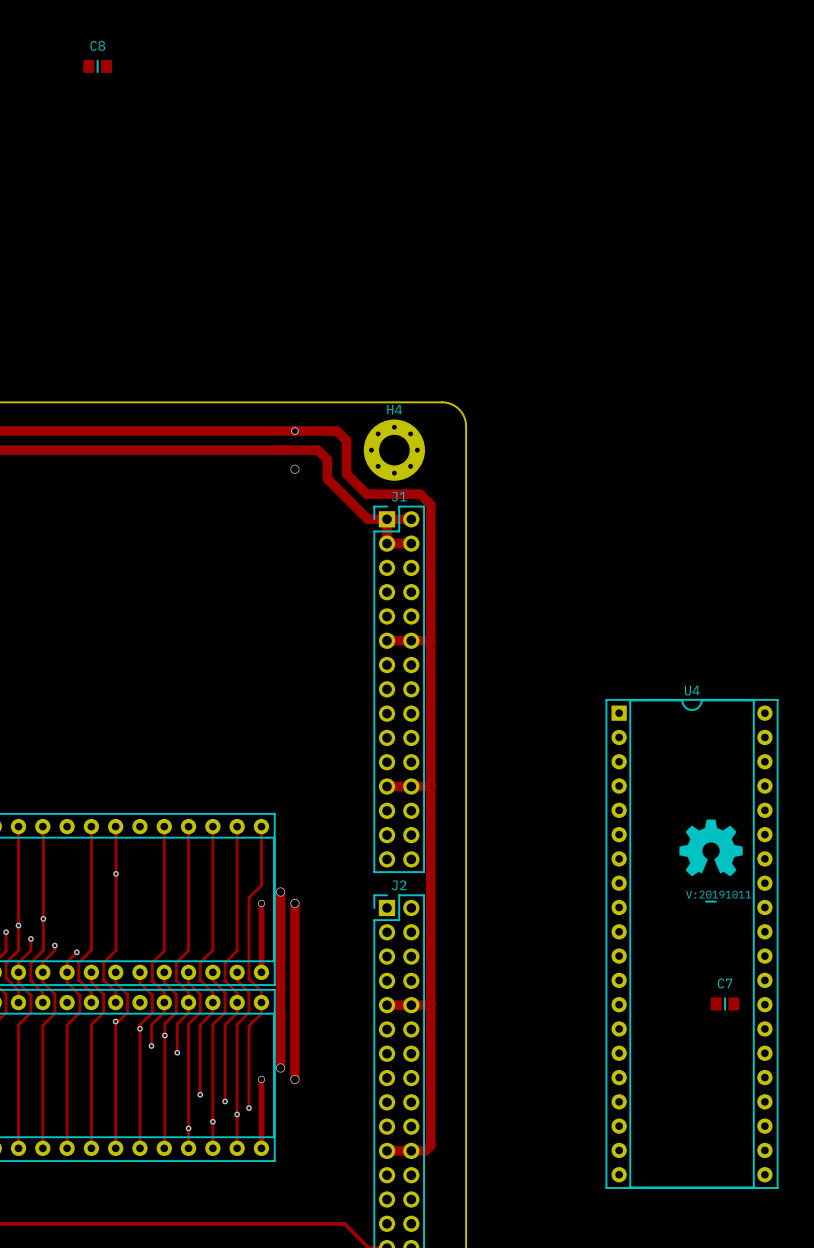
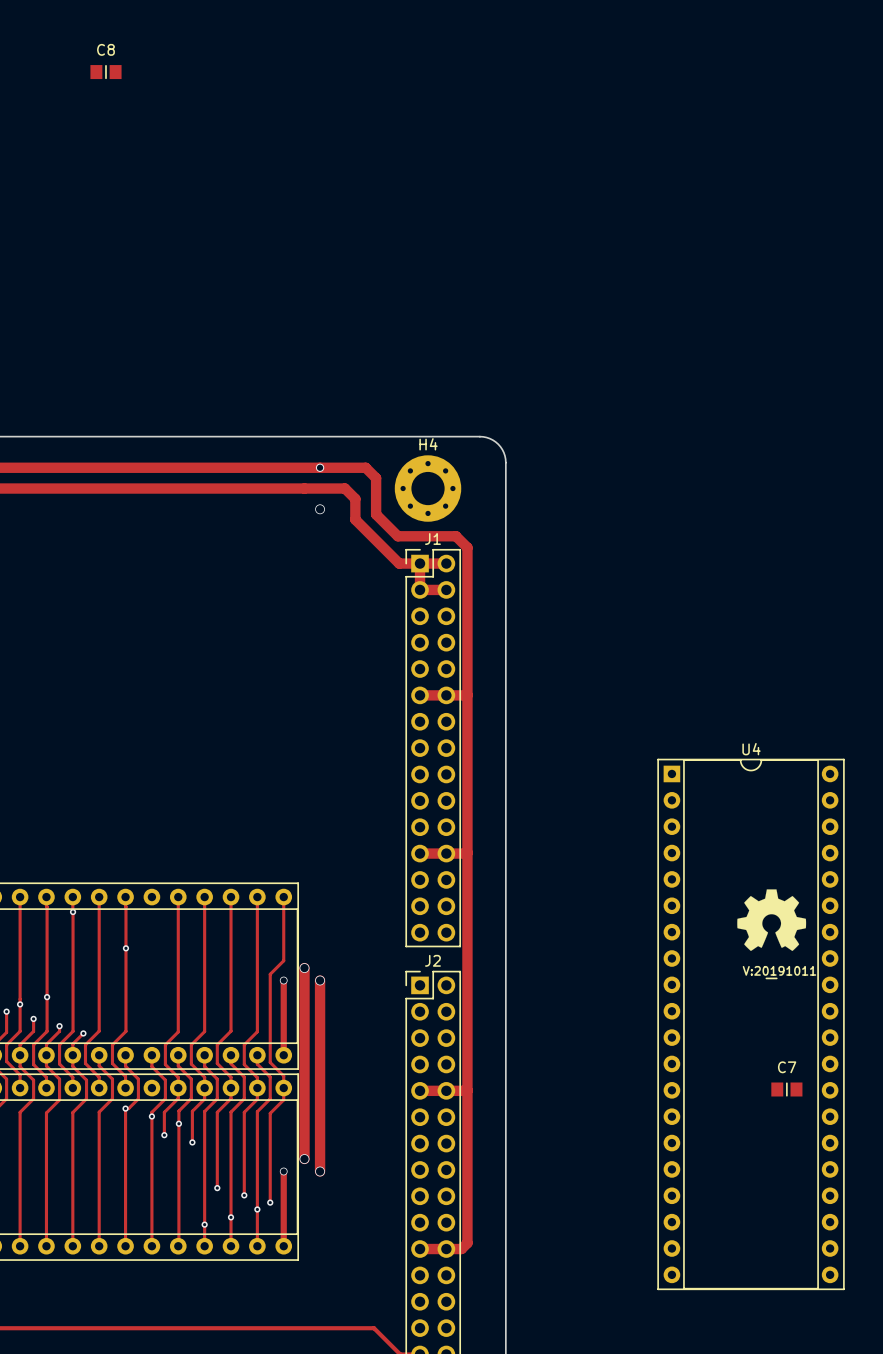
track: none -> (72, 897) (73, 1031) (59, 1044) (59, 1064) (72, 1077) (72, 1088)
via: none -> (73, 912)

